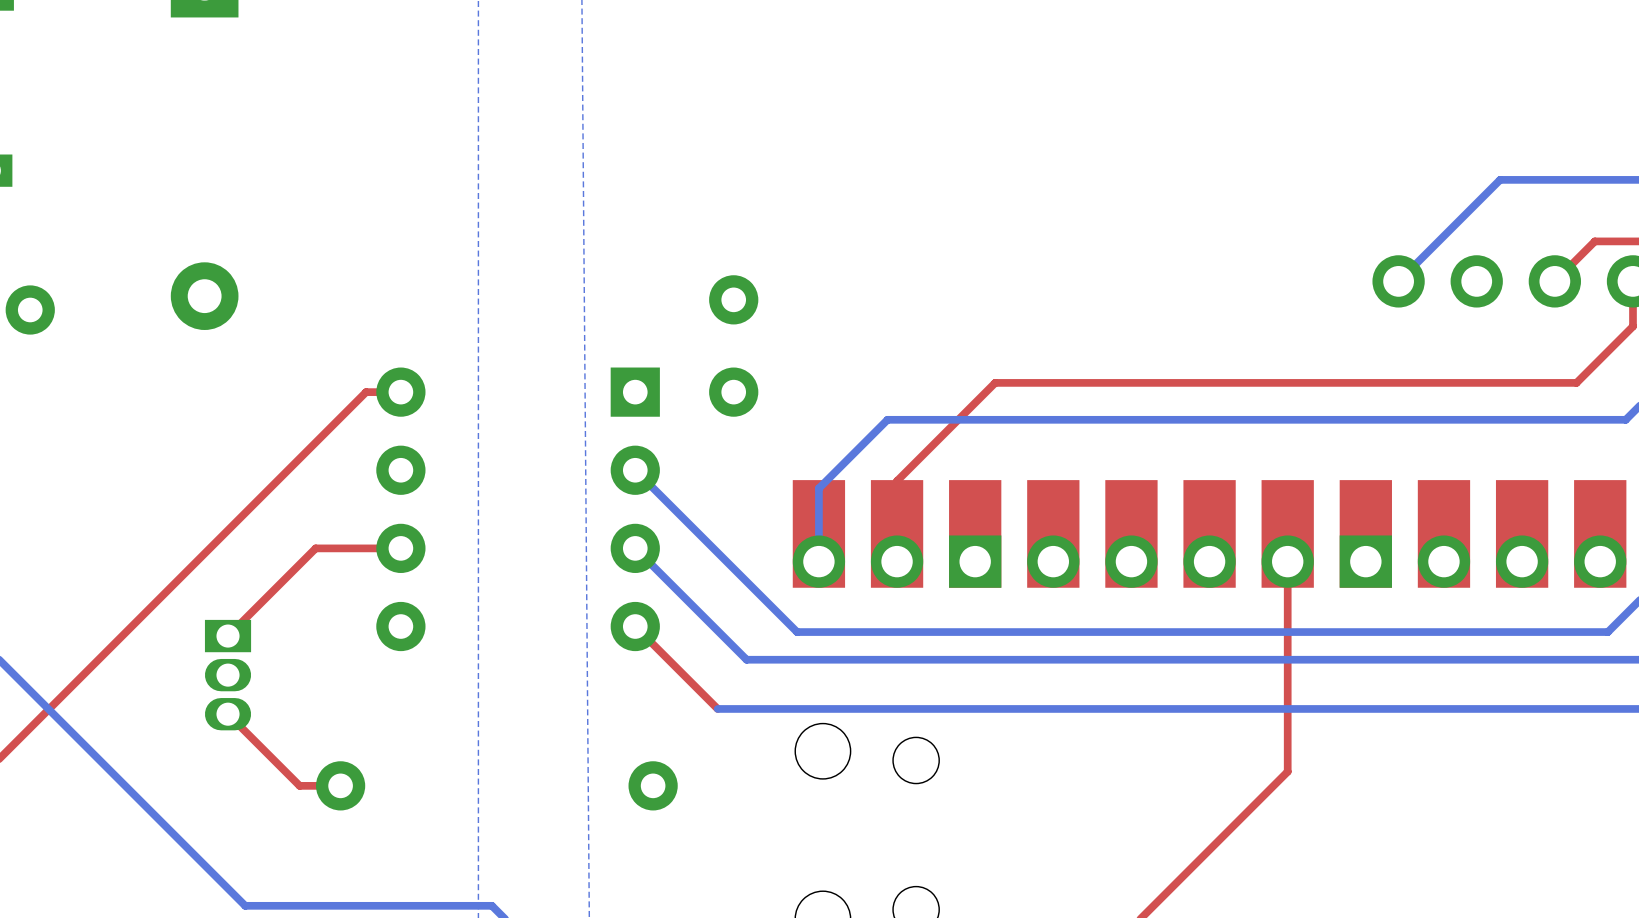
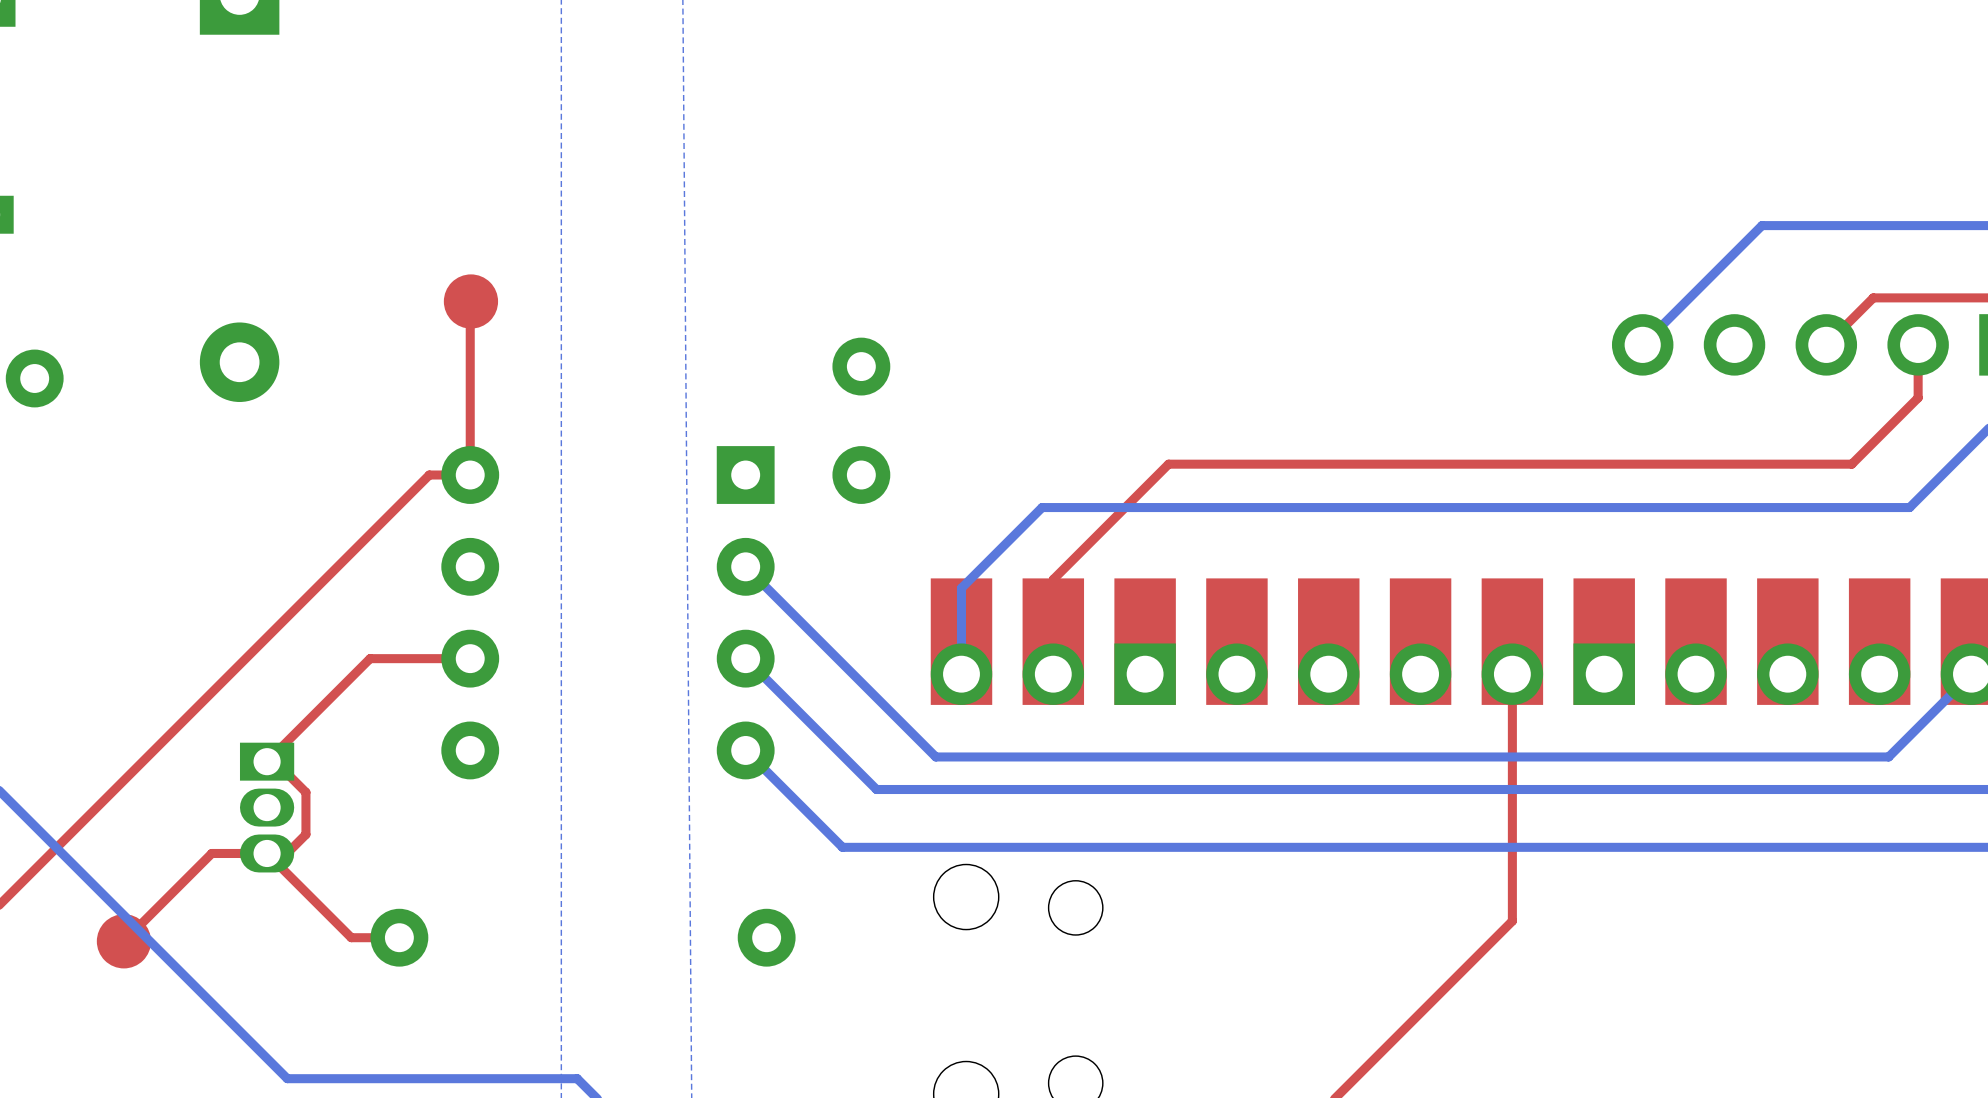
top track: none -> (470, 301) (470, 475)
part: none -> (470, 301)
top track: (635, 626) (717, 708) -> none
bottom track: none -> (745, 750) (842, 847)
top track: none -> (267, 761) (275, 761) (305, 792) (305, 834) (286, 853) (211, 853) (123, 941)
part: none -> (123, 941)

